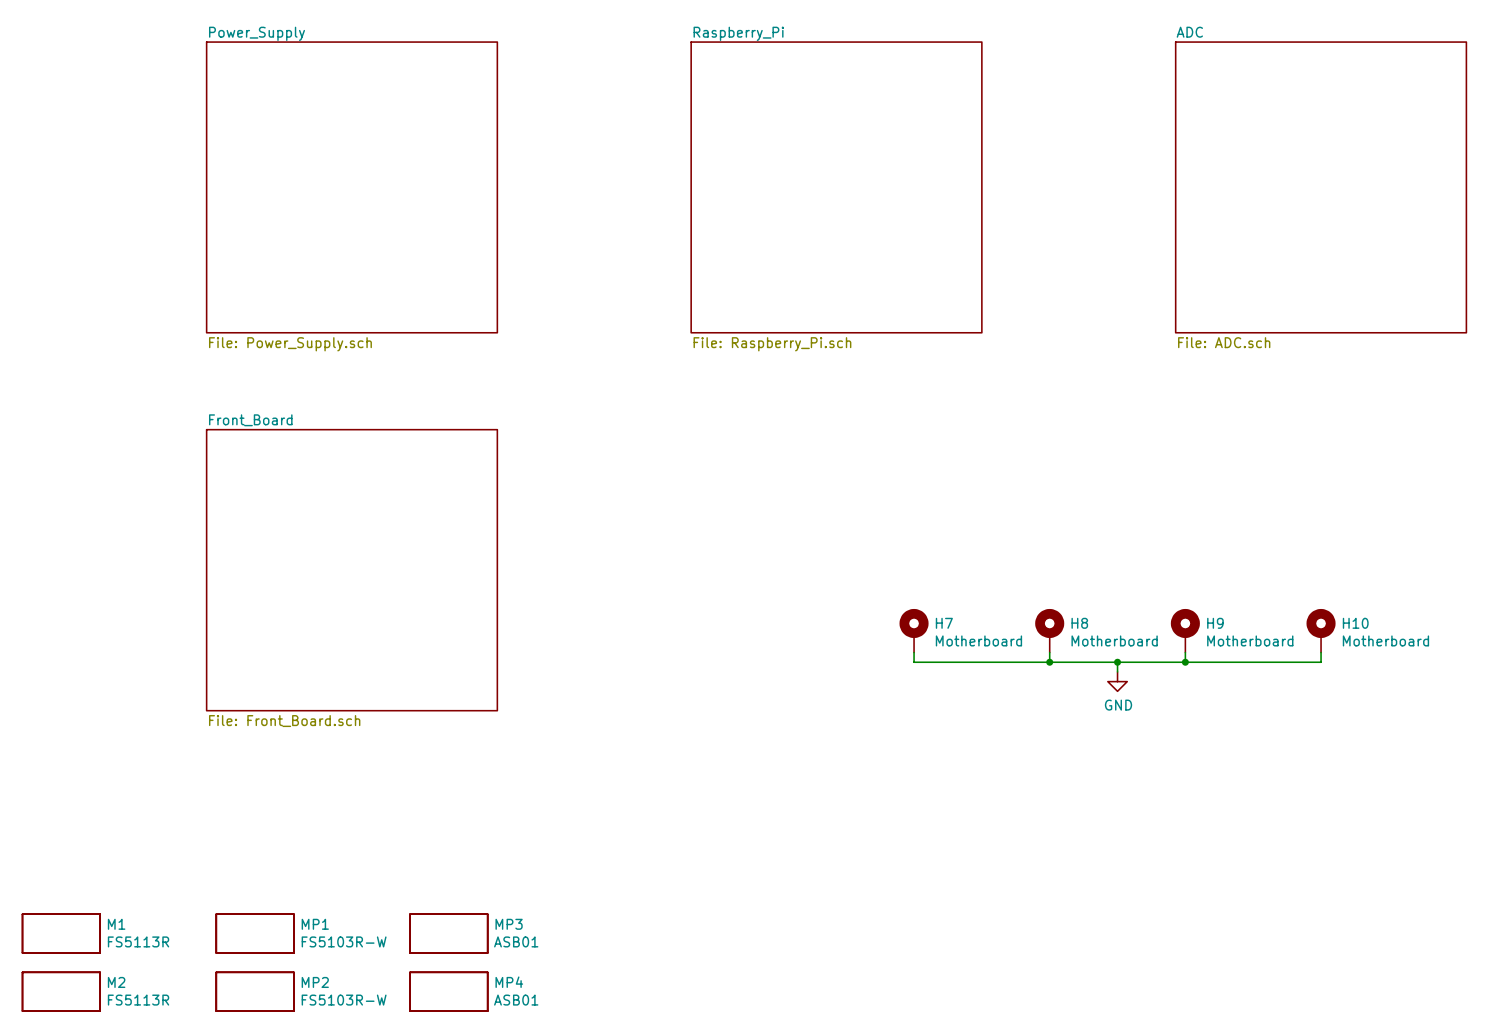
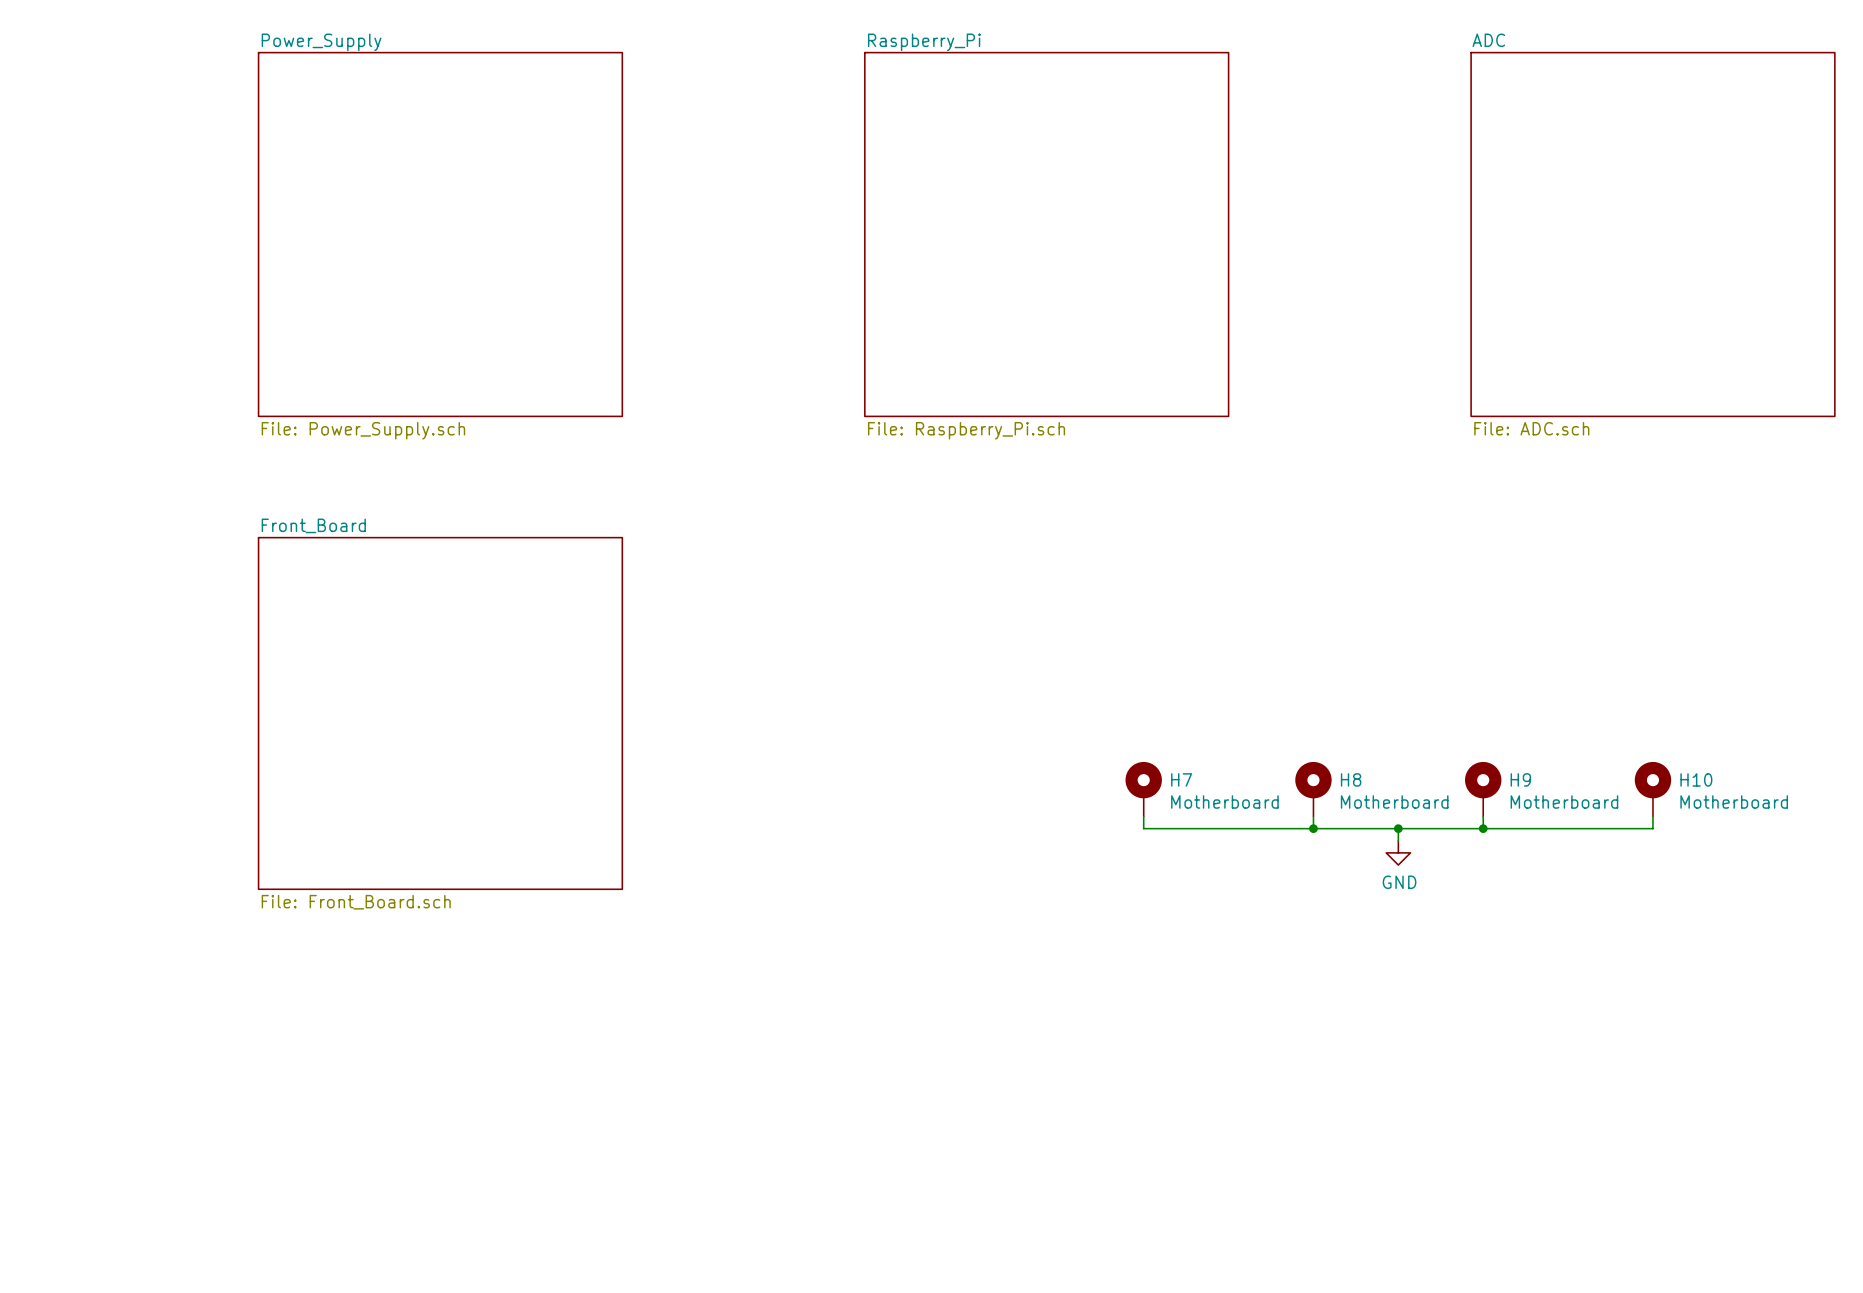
M1: FS5113R (61, 933) -> none
MP1: FS5103R-W (255, 933) -> none
MP3: ASB01 (448, 933) -> none
M2: FS5113R (61, 991) -> none
MP2: FS5103R-W (255, 991) -> none
MP4: ASB01 (448, 991) -> none

